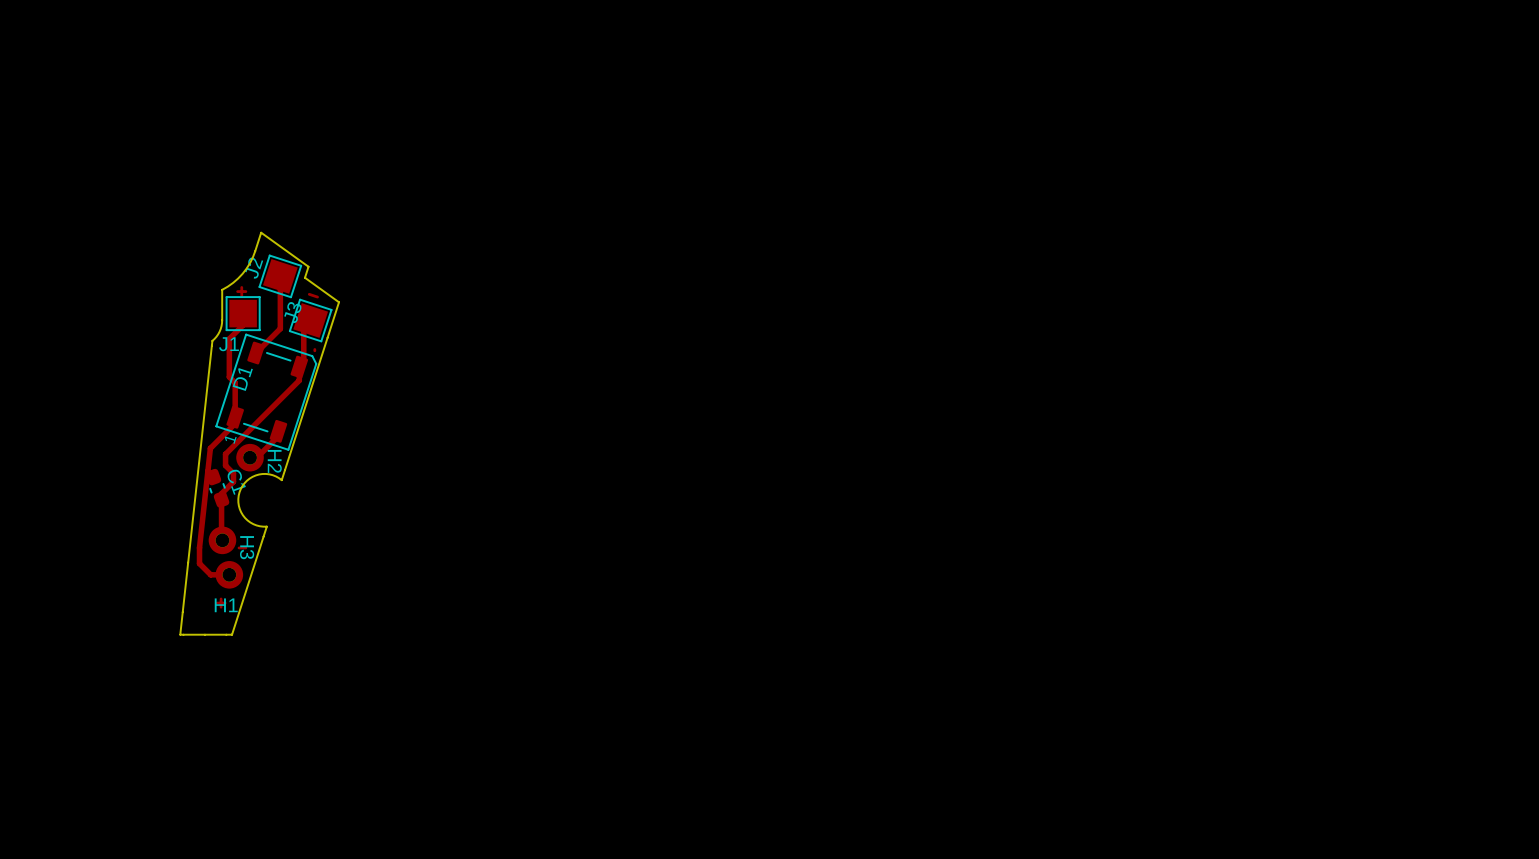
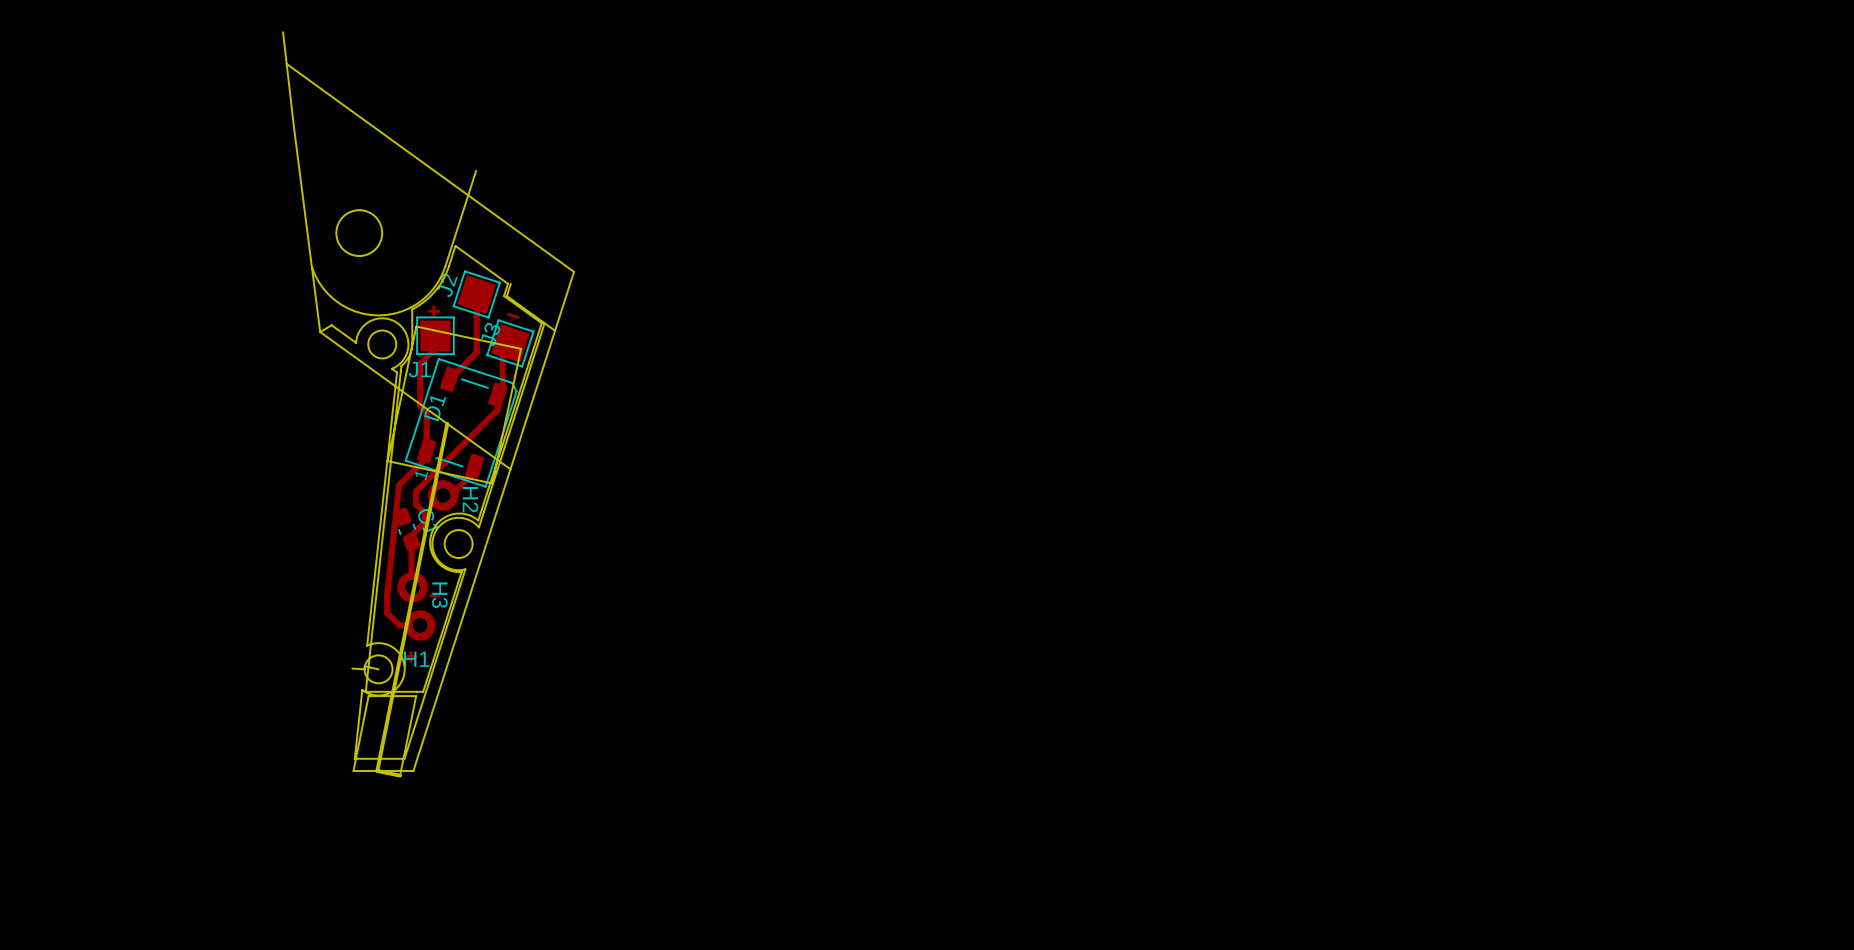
board edge: none -> (283, 32) (320, 332)
board edge: none -> (286, 64) (574, 271) (413, 771) (353, 771) (368, 696) (416, 696) (400, 775) (377, 771)
board edge: none -> (476, 170) (442, 274) (428, 294) (416, 304) (402, 311) (386, 314) (370, 314) (354, 311) (340, 304) (328, 294) (318, 281) (311, 266)
round board edge: none -> [335, 209, 383, 257]
board edge: none -> (510, 283) (506, 296) (555, 330)
board edge: none -> (544, 323) (478, 527) (465, 518) (452, 518) (440, 524) (433, 535) (432, 549) (438, 560) (449, 568) (465, 569) (404, 758) (354, 758) (362, 689) (377, 695) (390, 692) (400, 684) (404, 672) (402, 659) (394, 648) (383, 643) (367, 645) (397, 372) (392, 368) (404, 358) (408, 349) (407, 339) (400, 325) (385, 318) (375, 319) (366, 323) (358, 333) (356, 342) (331, 325) (320, 332)
board edge: none -> (416, 326) (387, 461) (492, 483) (521, 348) (416, 326)
round board edge: none -> [367, 329, 398, 360]
board edge: none -> (320, 332) (510, 469)
board edge: none -> (447, 423) (377, 771)
round board edge: none -> [443, 529, 474, 559]
round board edge: none -> [363, 654, 394, 685]
board edge: none -> (352, 668) (364, 669) (364, 666) (378, 669)

